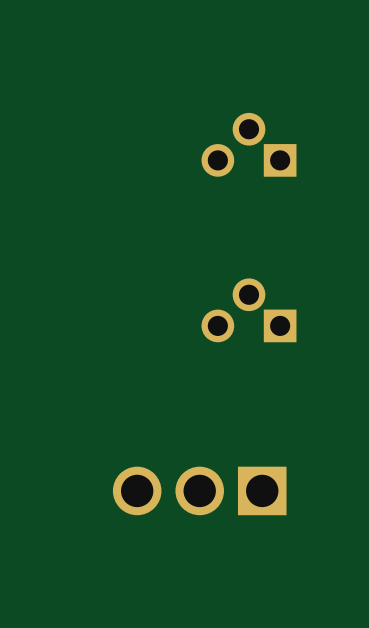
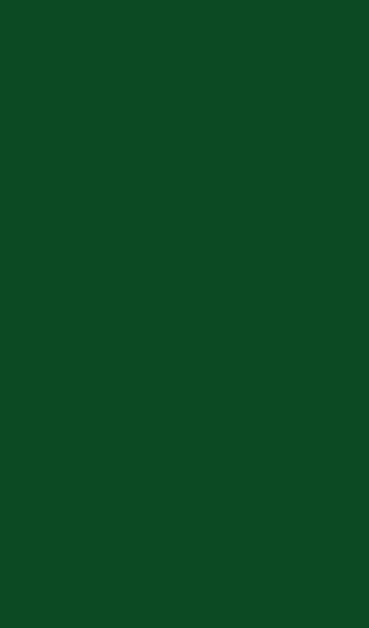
part: (249, 144) -> none
part: (249, 310) -> none
part: (199, 490) -> none

